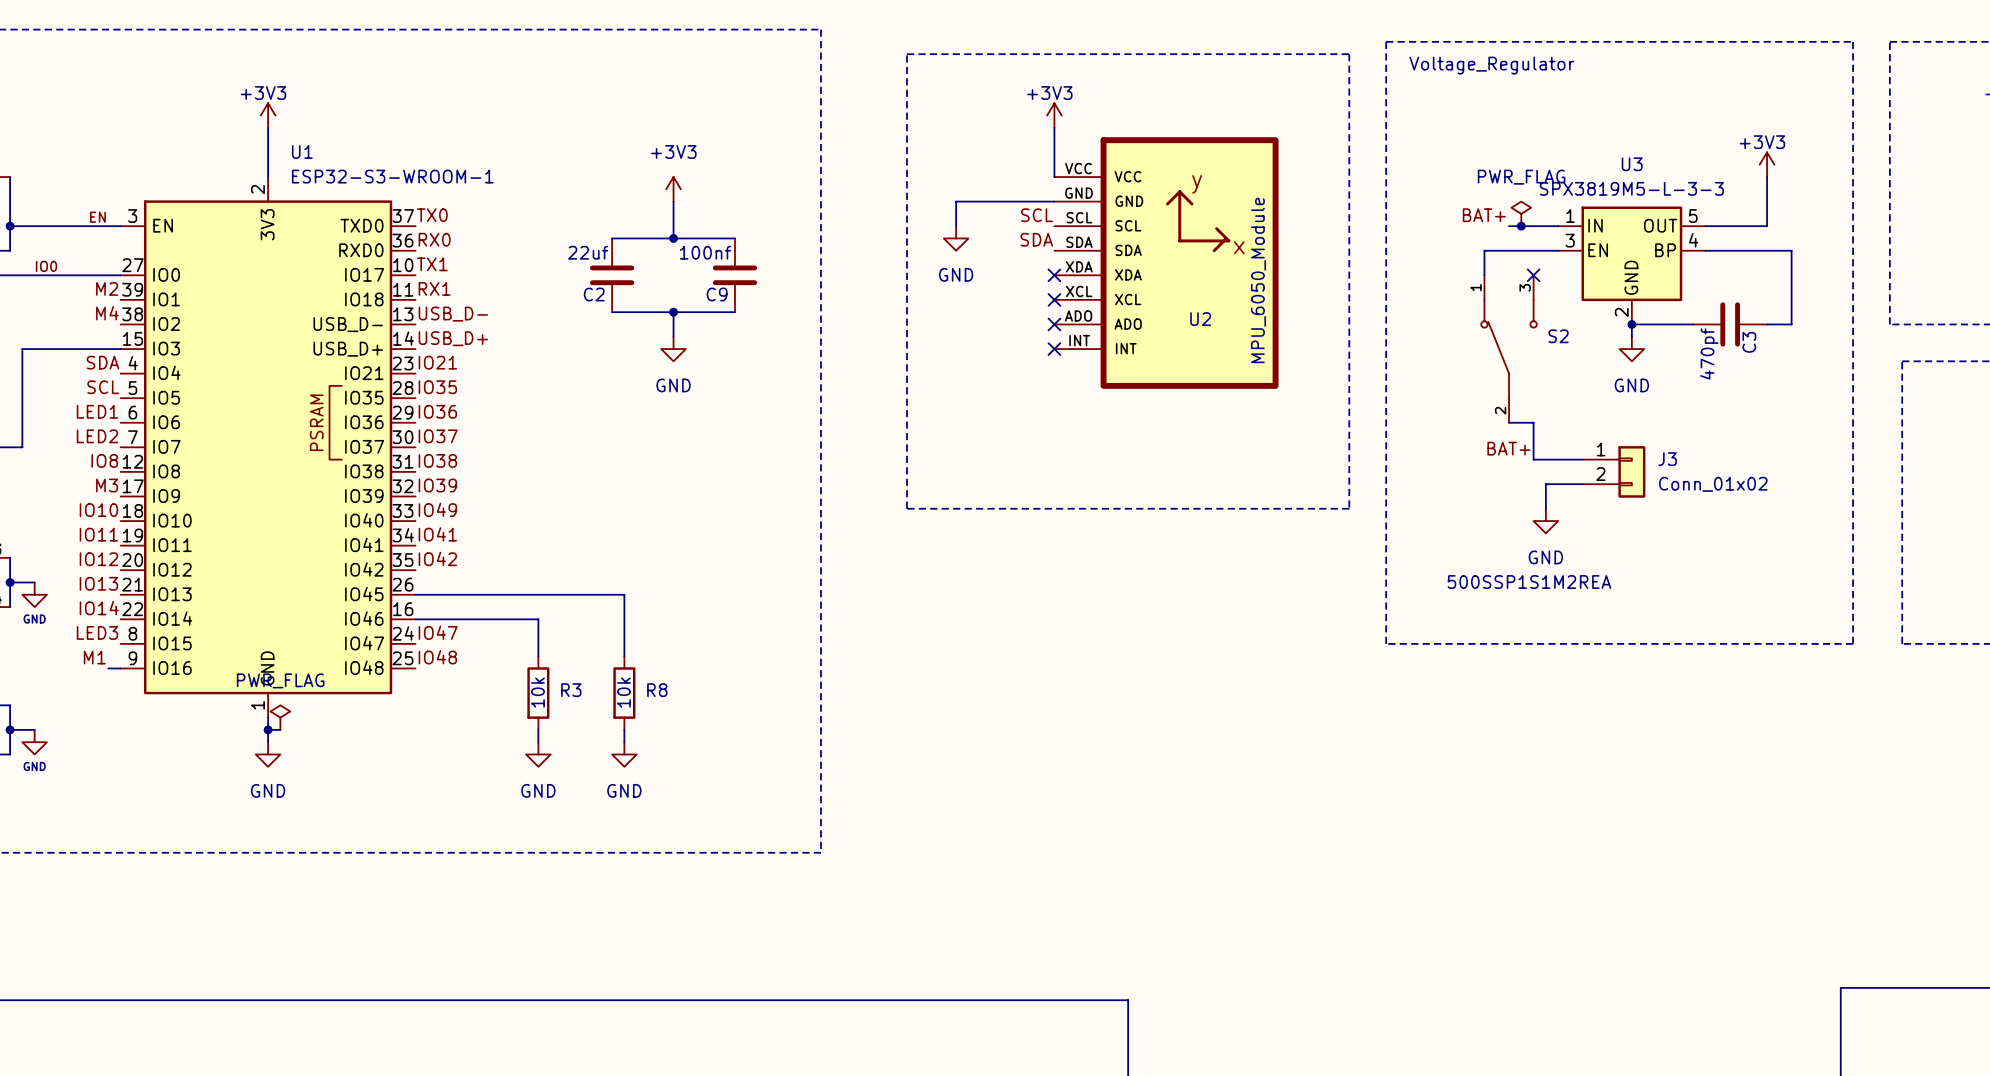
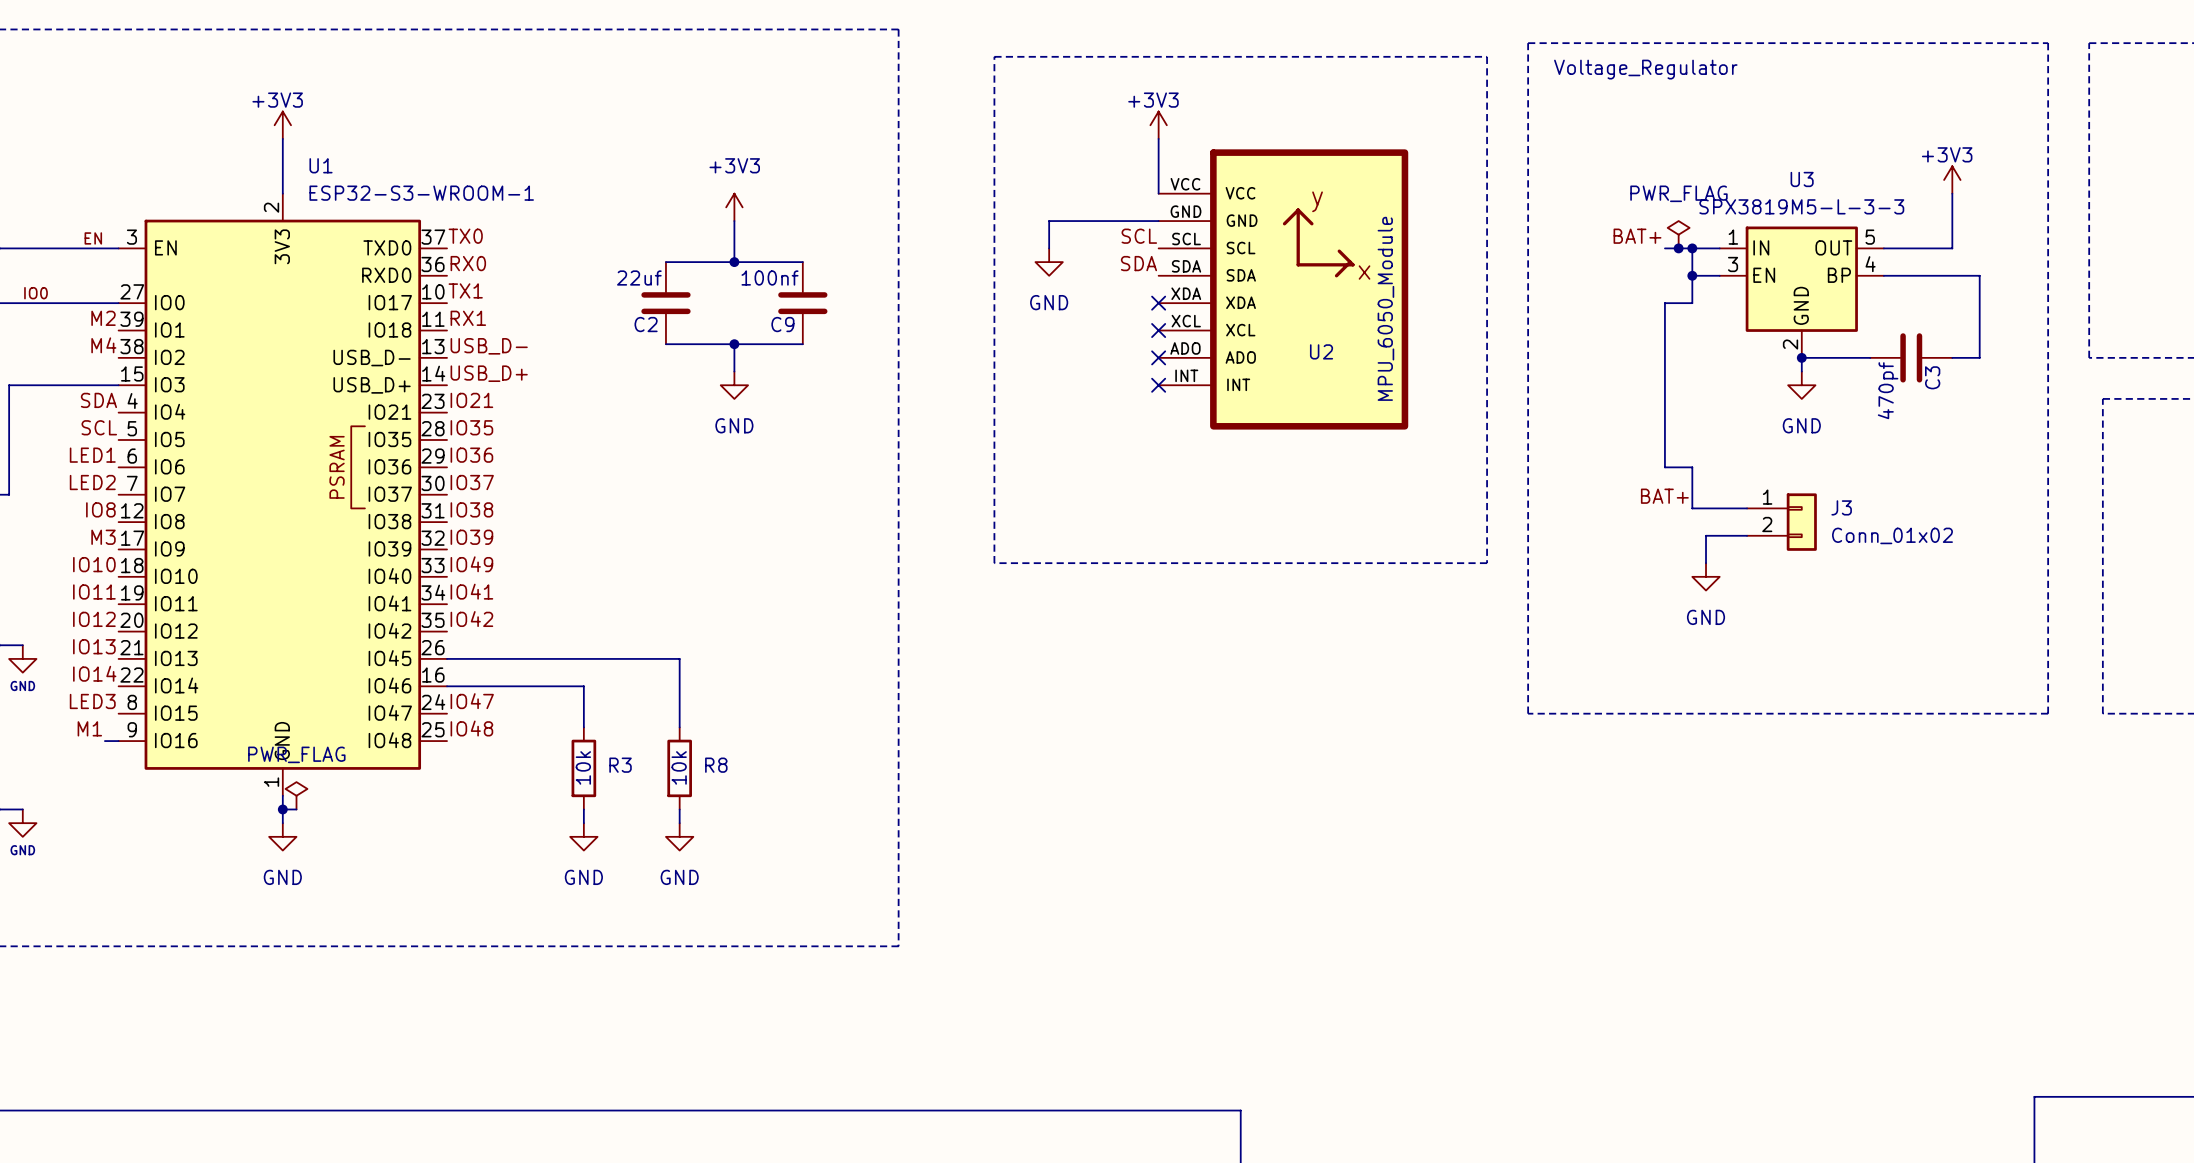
wire: none -> (1692, 248) (1692, 303) (1664, 303) (1664, 467)
junction: none -> (1692, 248)
wire: (1533, 250) (1484, 250) (1484, 275) -> none
junction: none -> (1692, 275)
no-connect mark: (1533, 275) -> none
S2: 500SSP1S1M2REA (1509, 349) -> none

